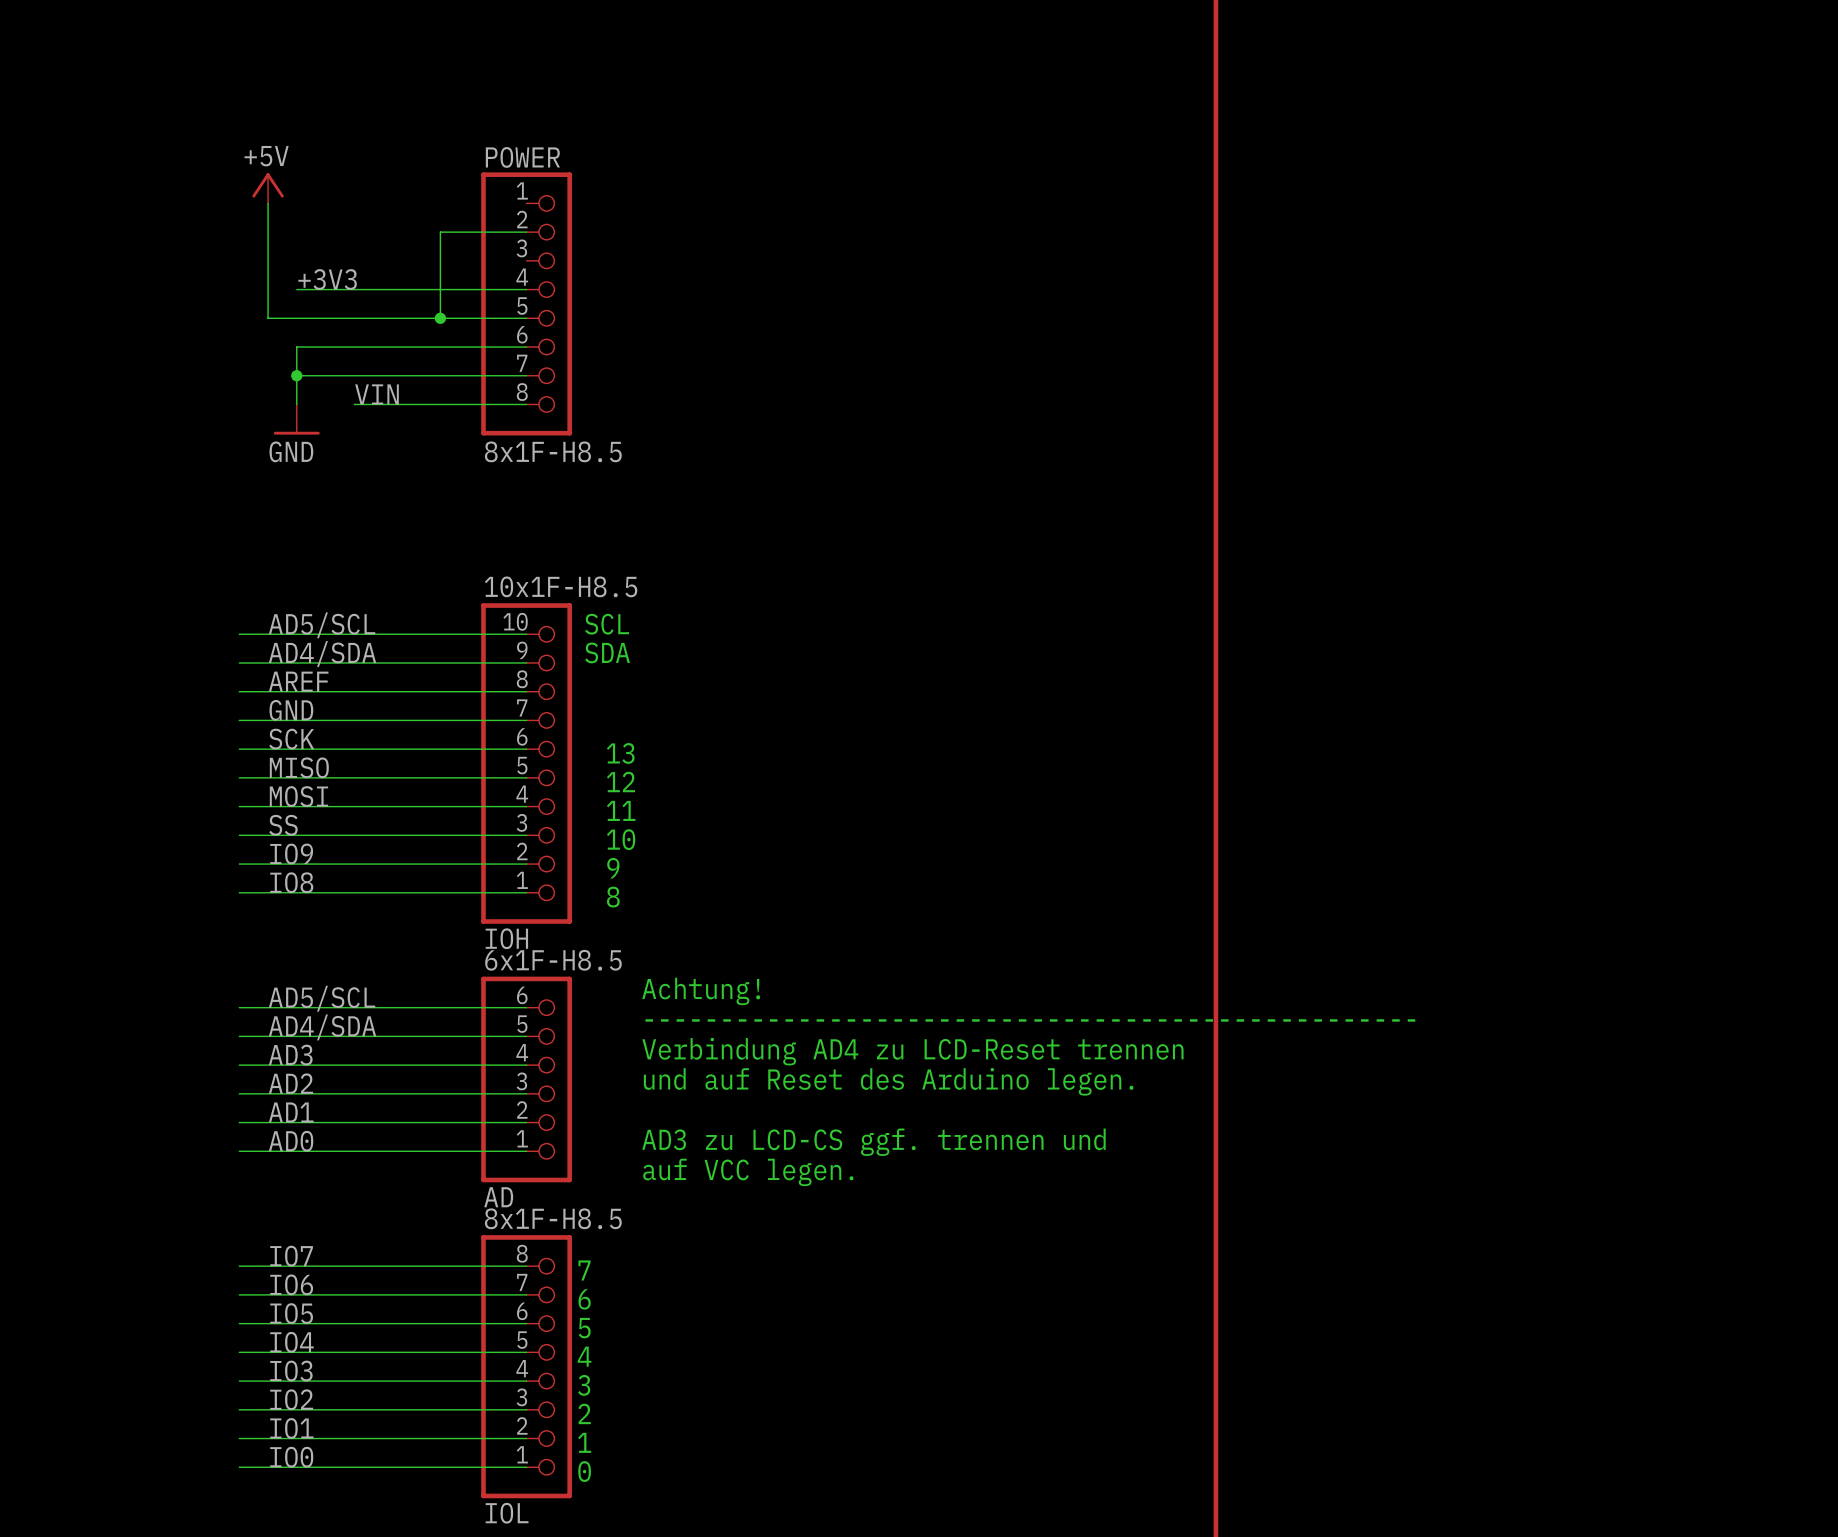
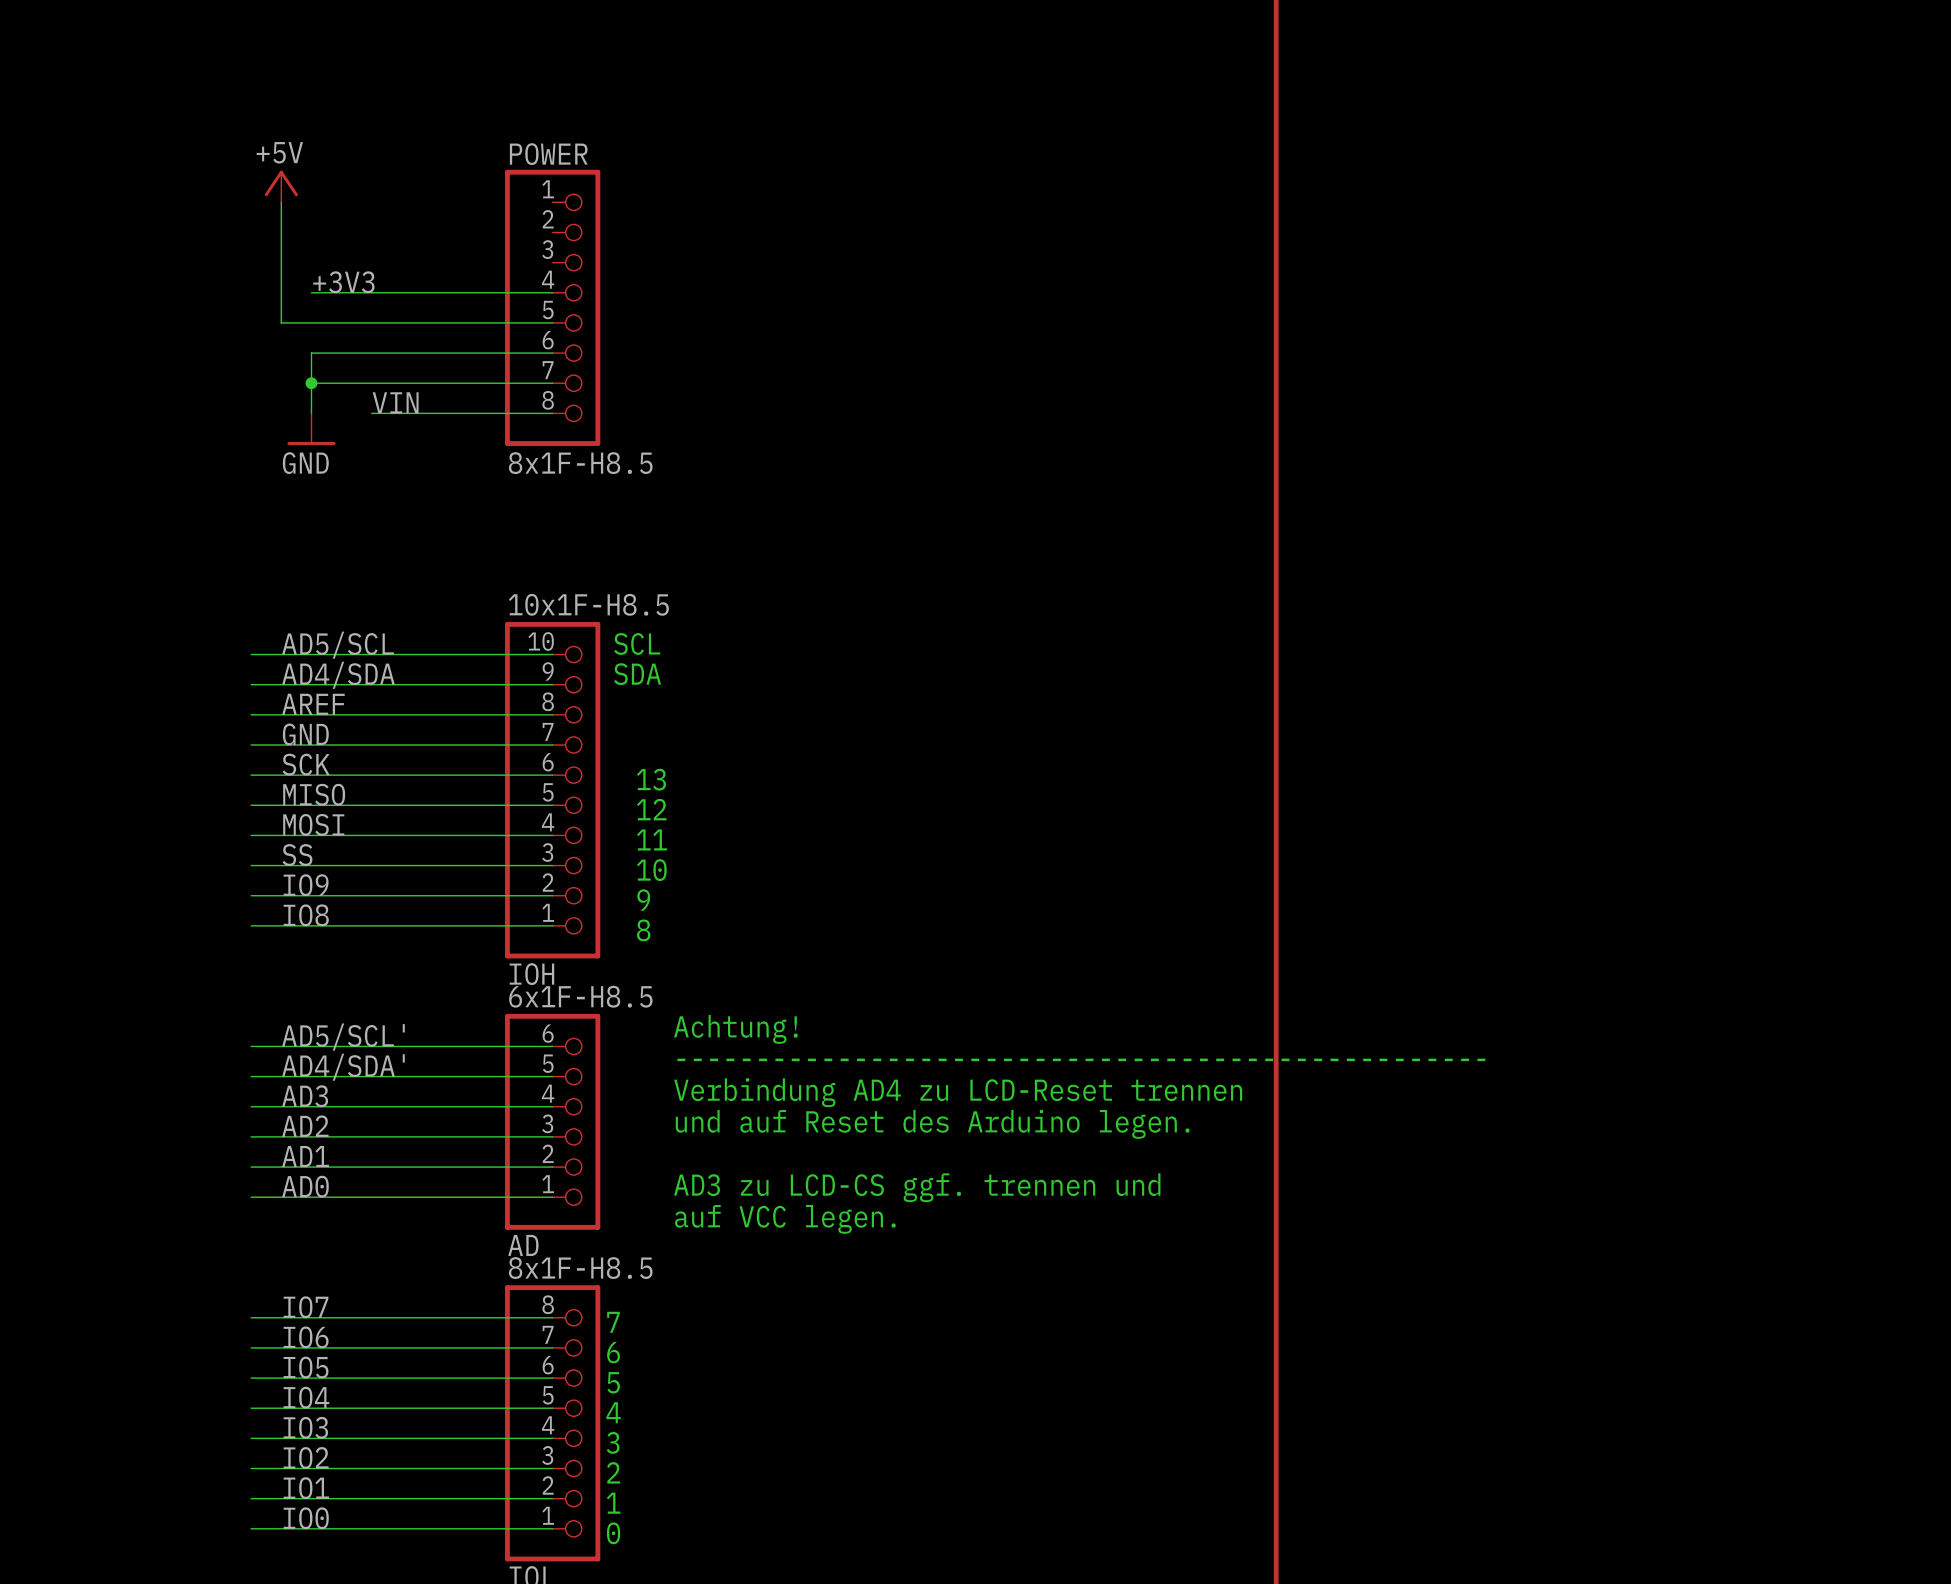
wire: (526, 232) (440, 232) (440, 318) -> none
junction: (440, 318) -> none
label: AD5/SCL (322, 998) -> AD5/SCL' (343, 1037)
label: AD4/SDA (322, 1027) -> AD4/SDA' (343, 1067)

